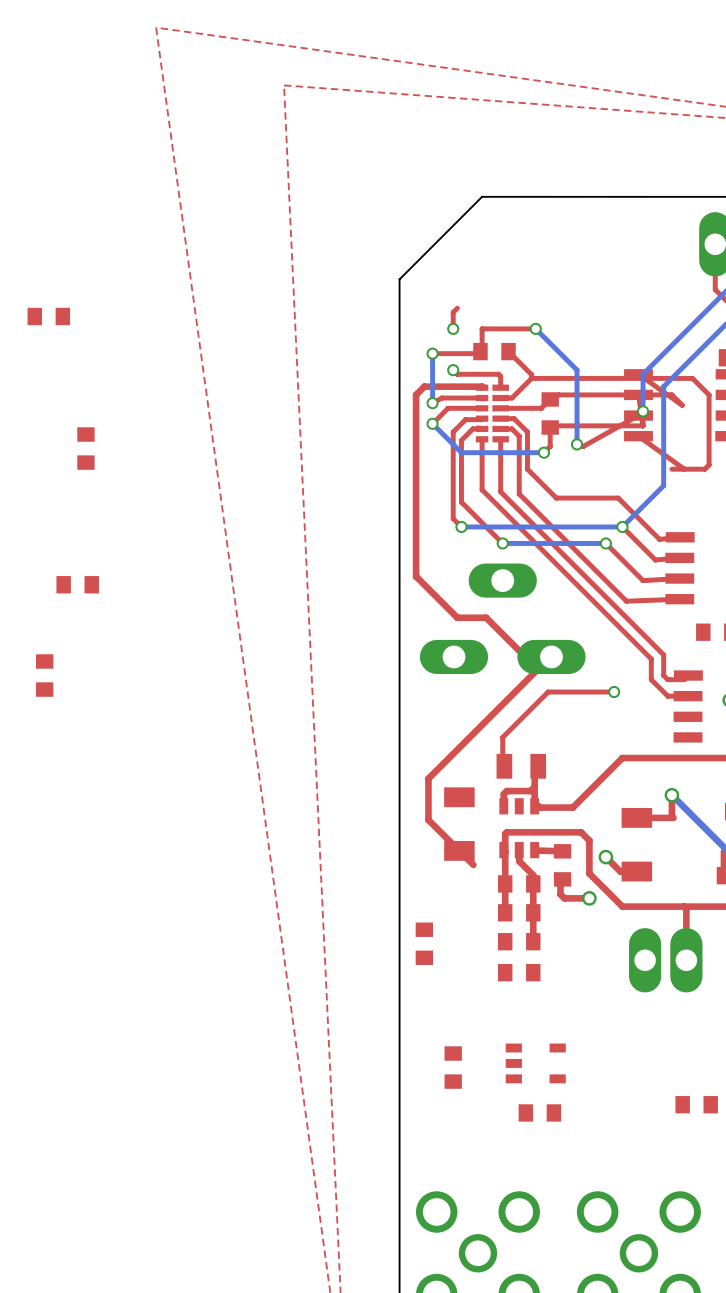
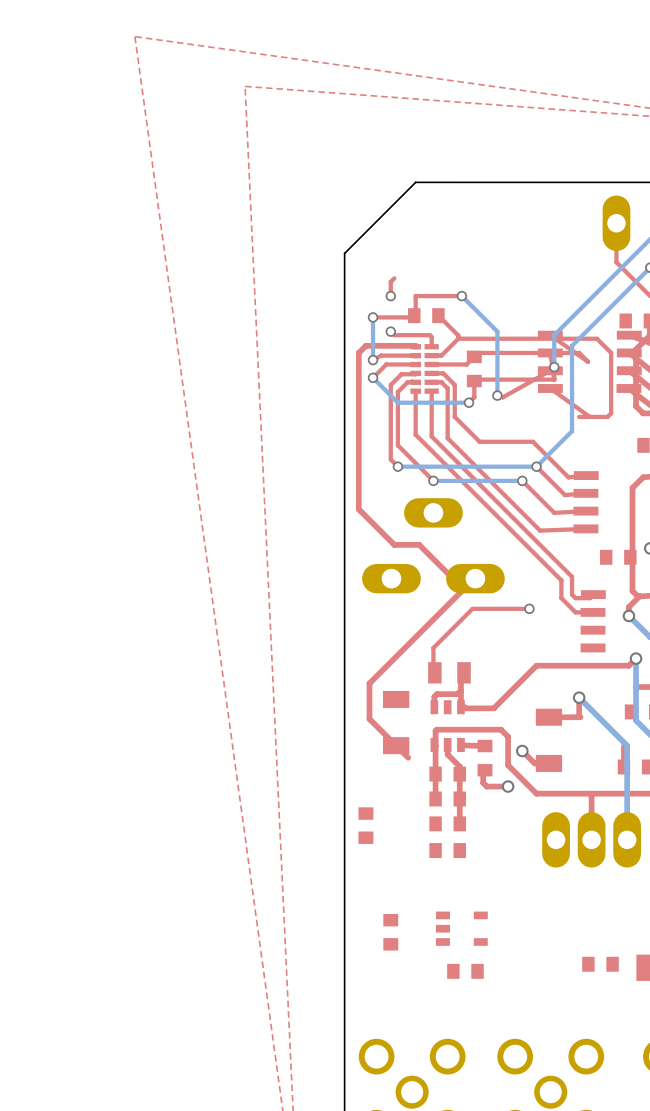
part: (48, 316) -> none
part: (85, 448) -> none
part: (77, 584) -> none
part: (44, 675) -> none

